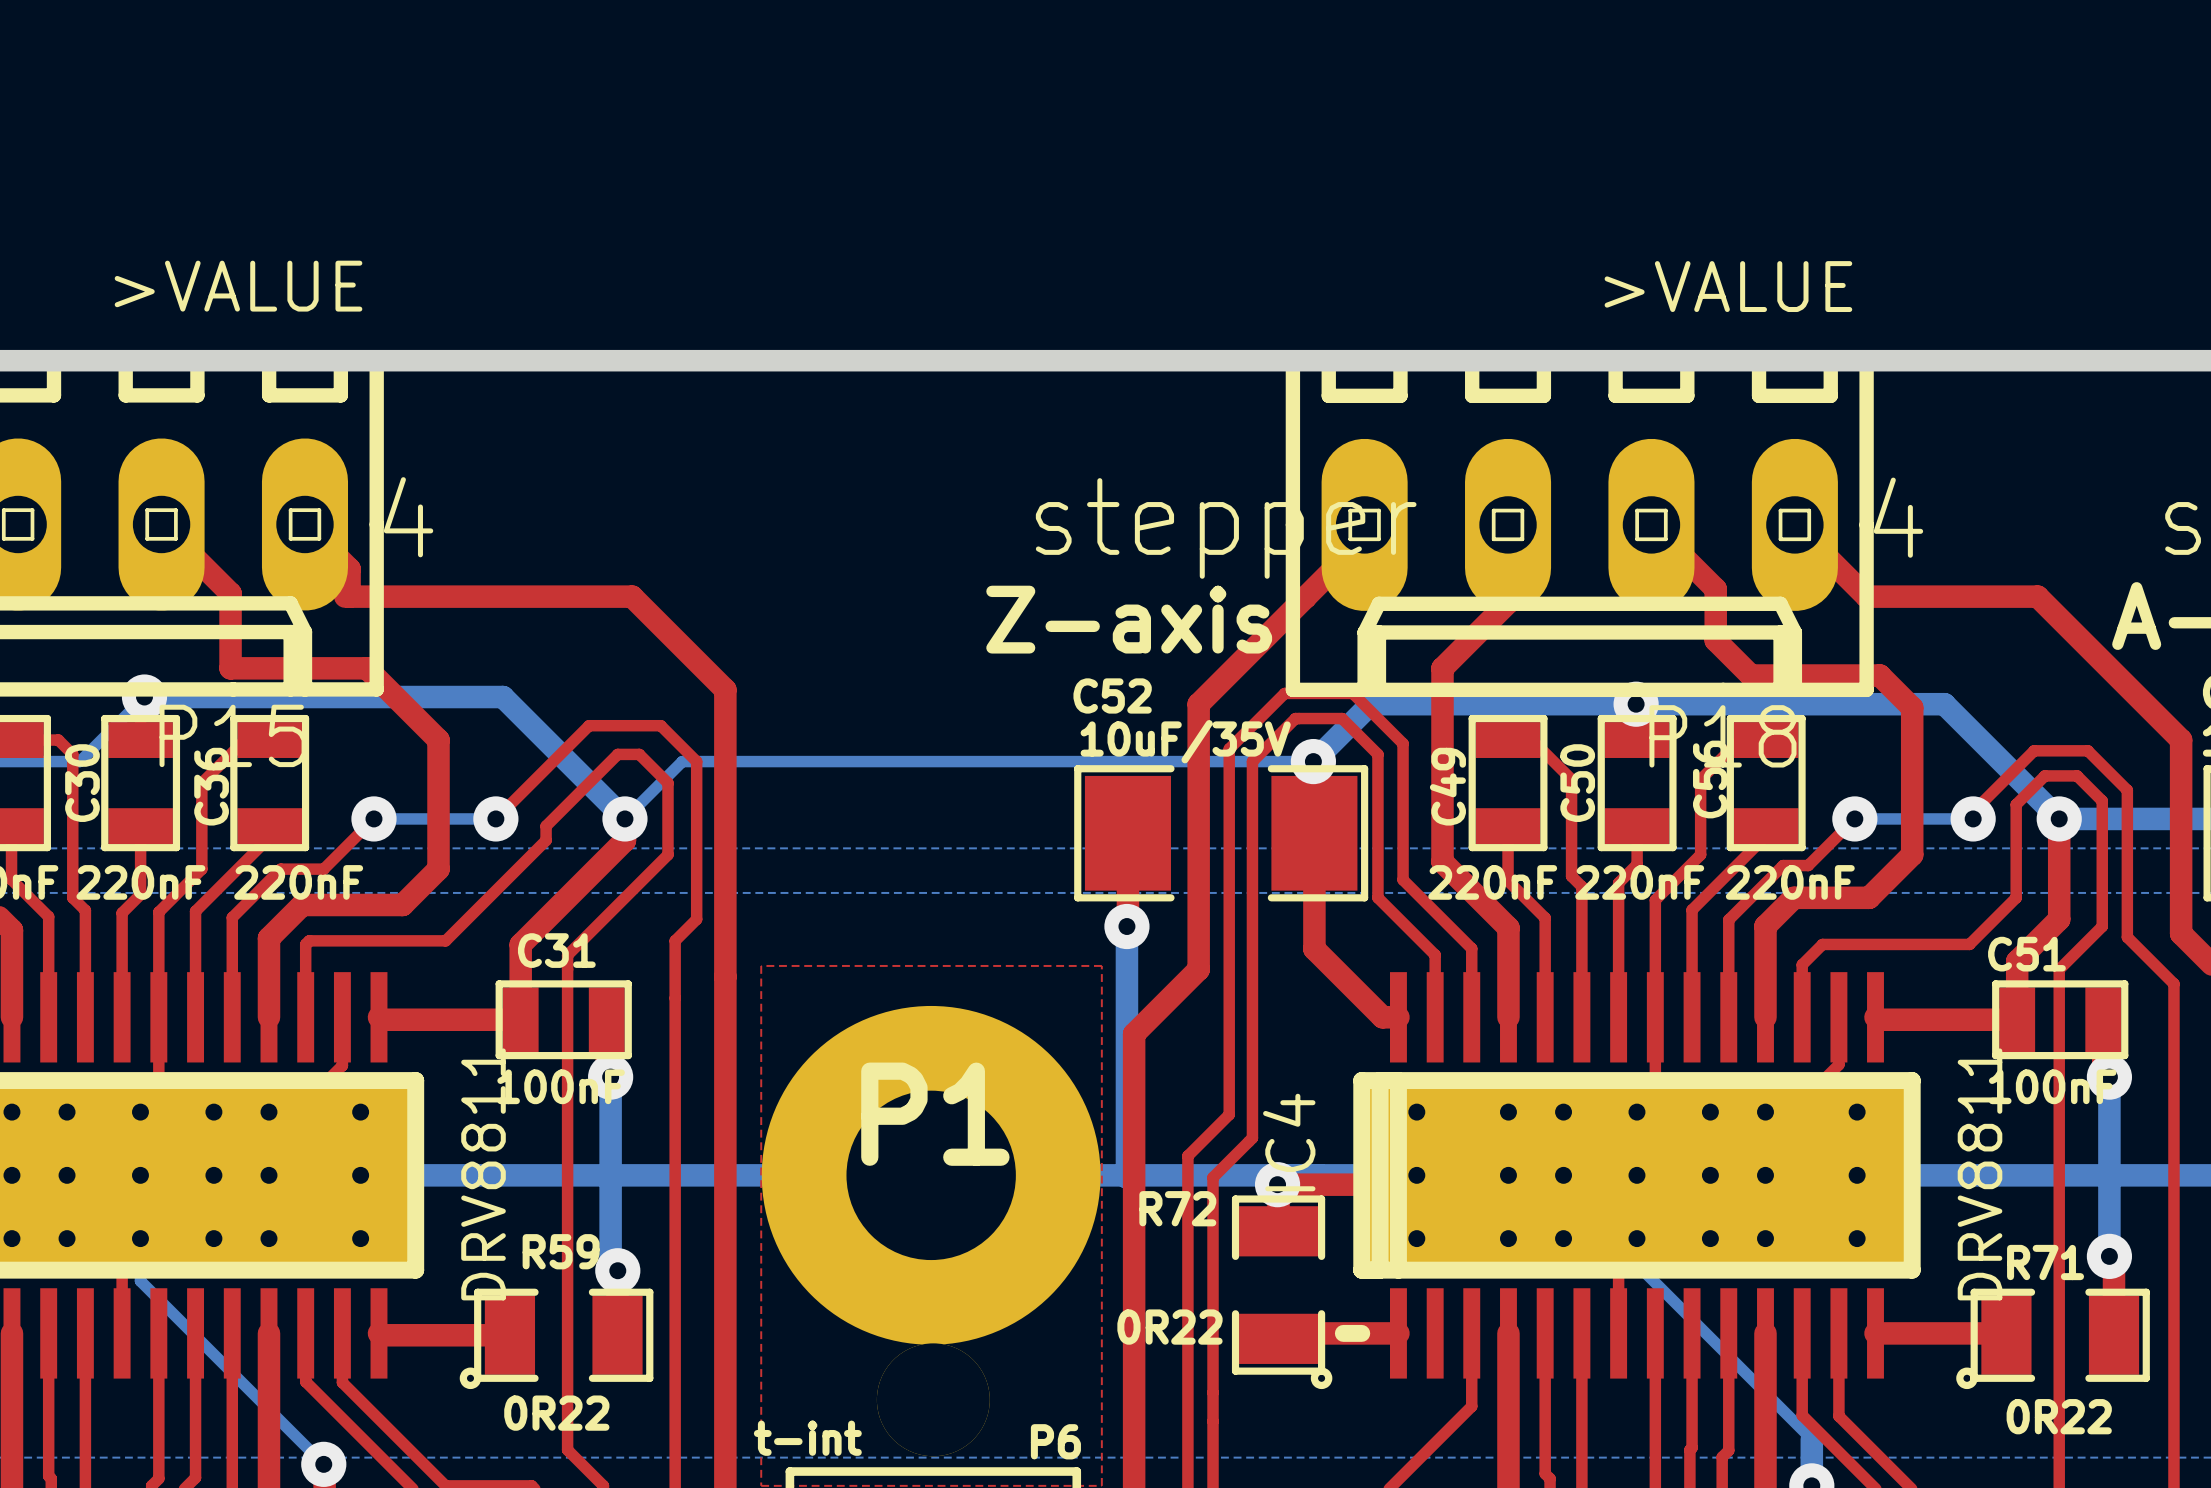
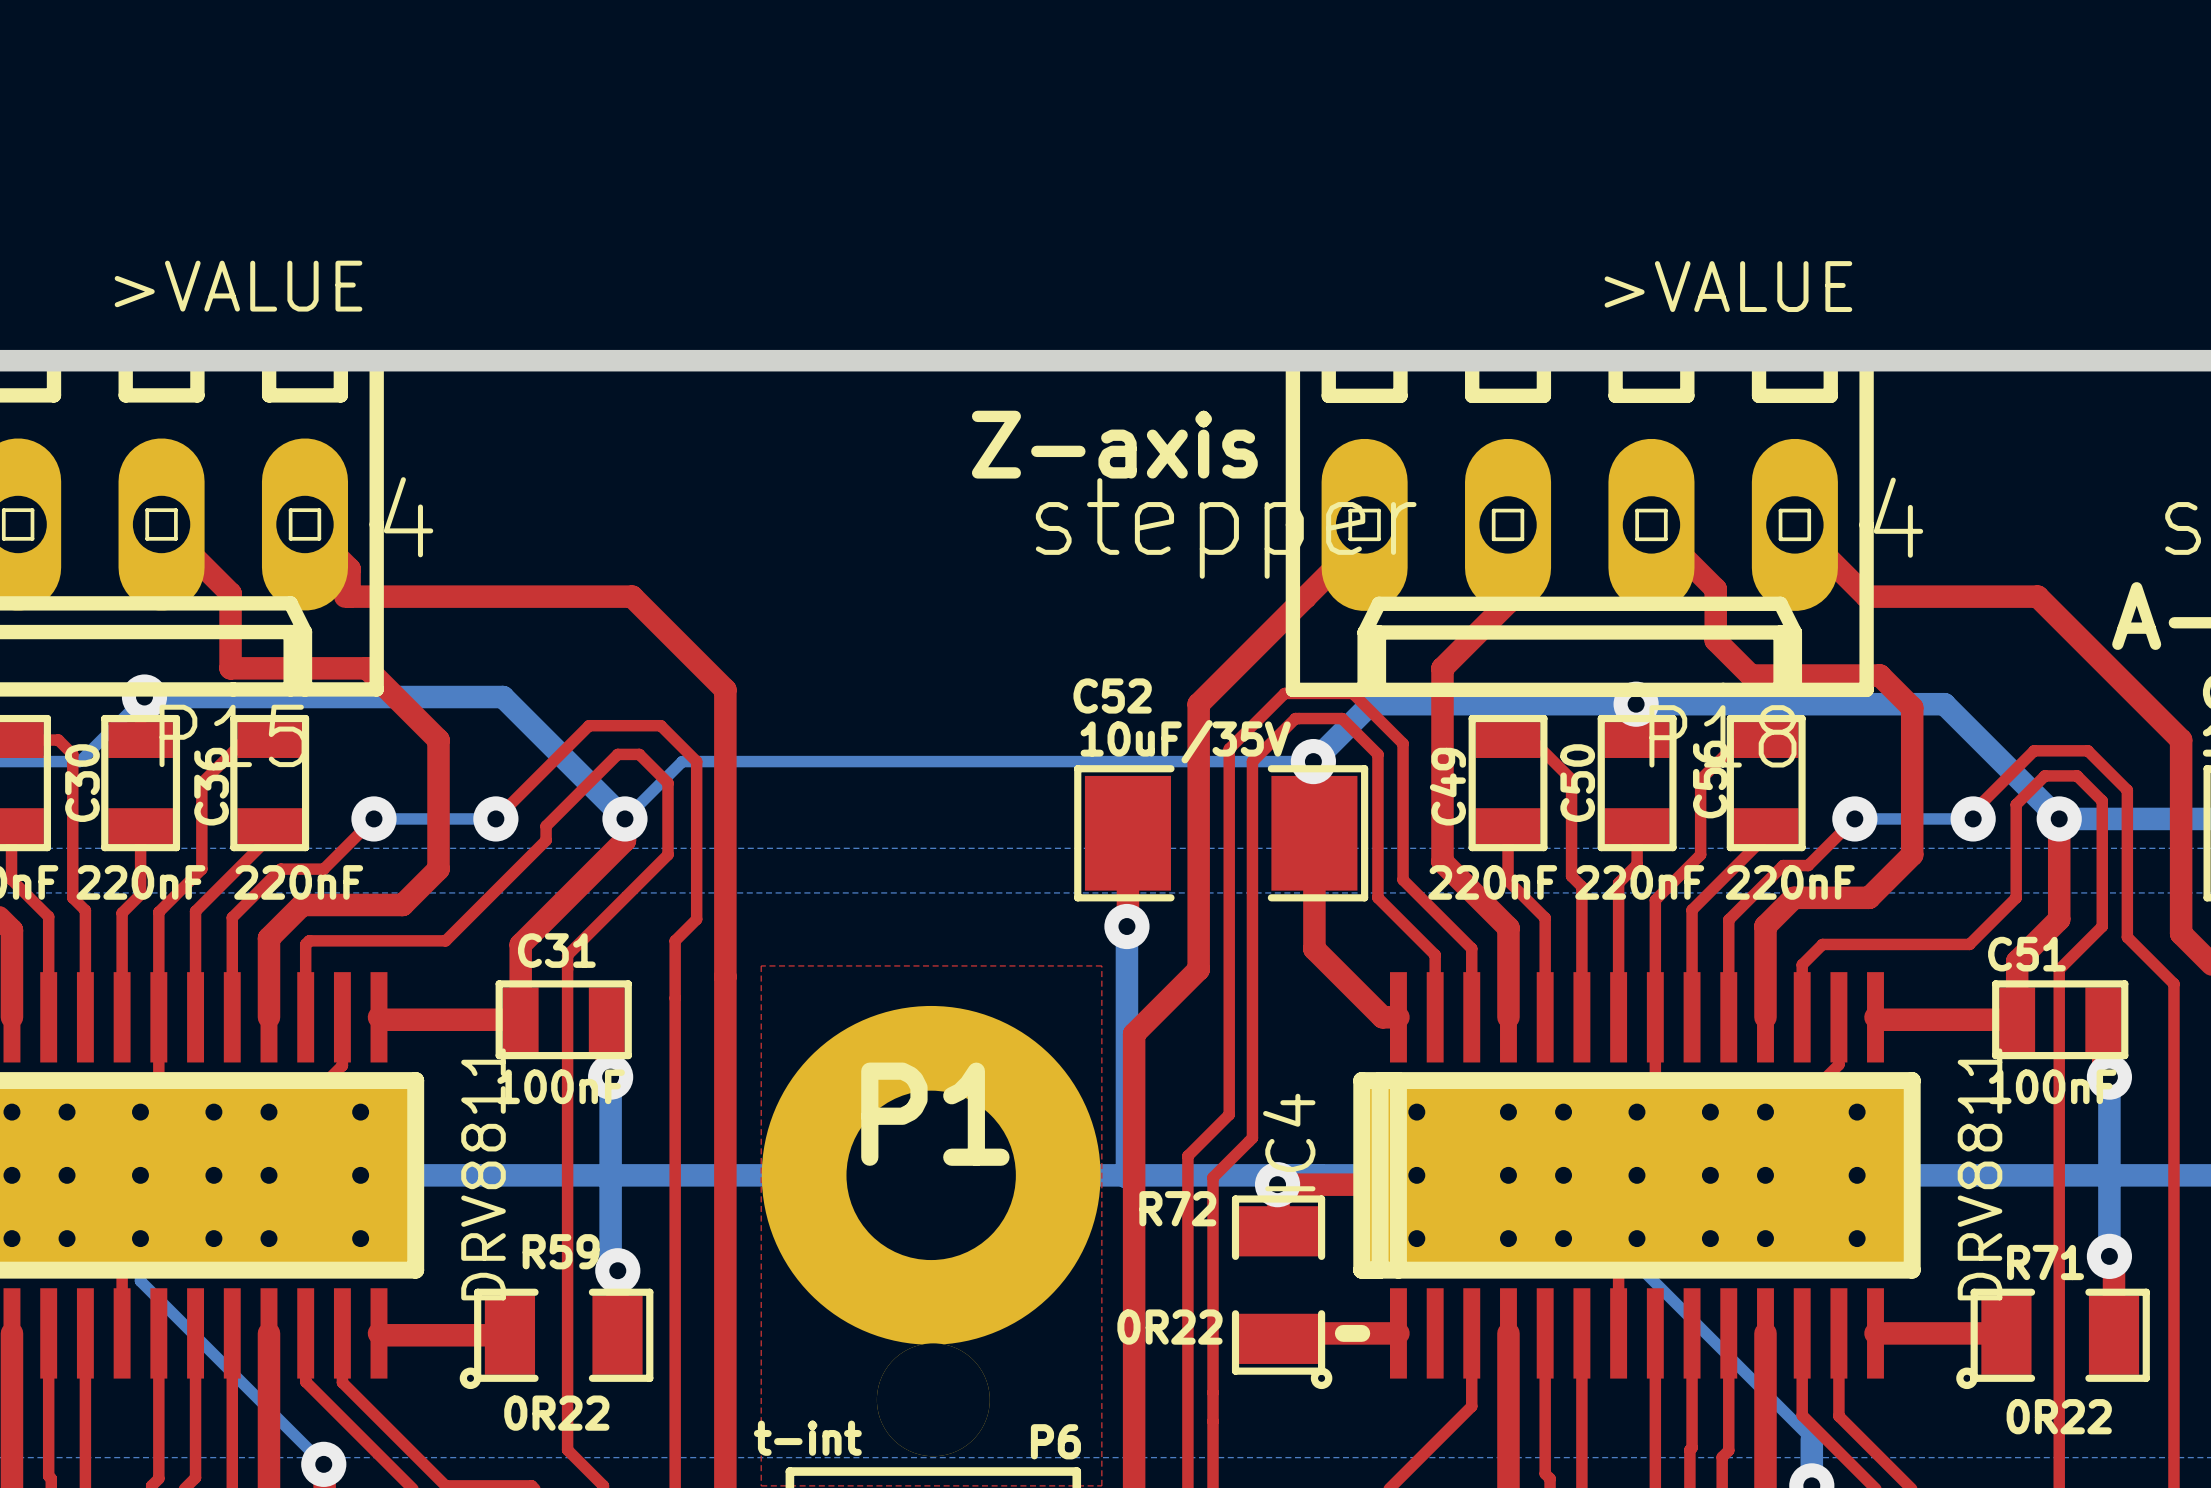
text position: Z-axis (1129, 619) -> Z-axis (1114, 444)

